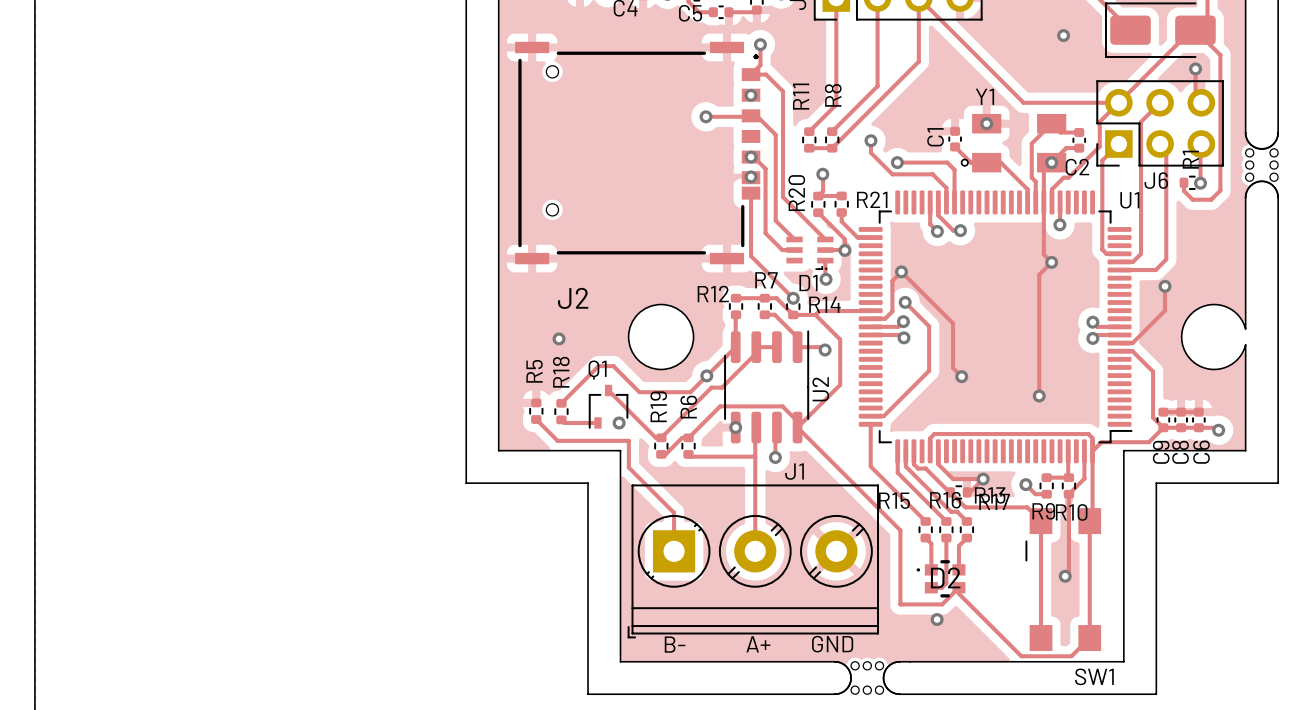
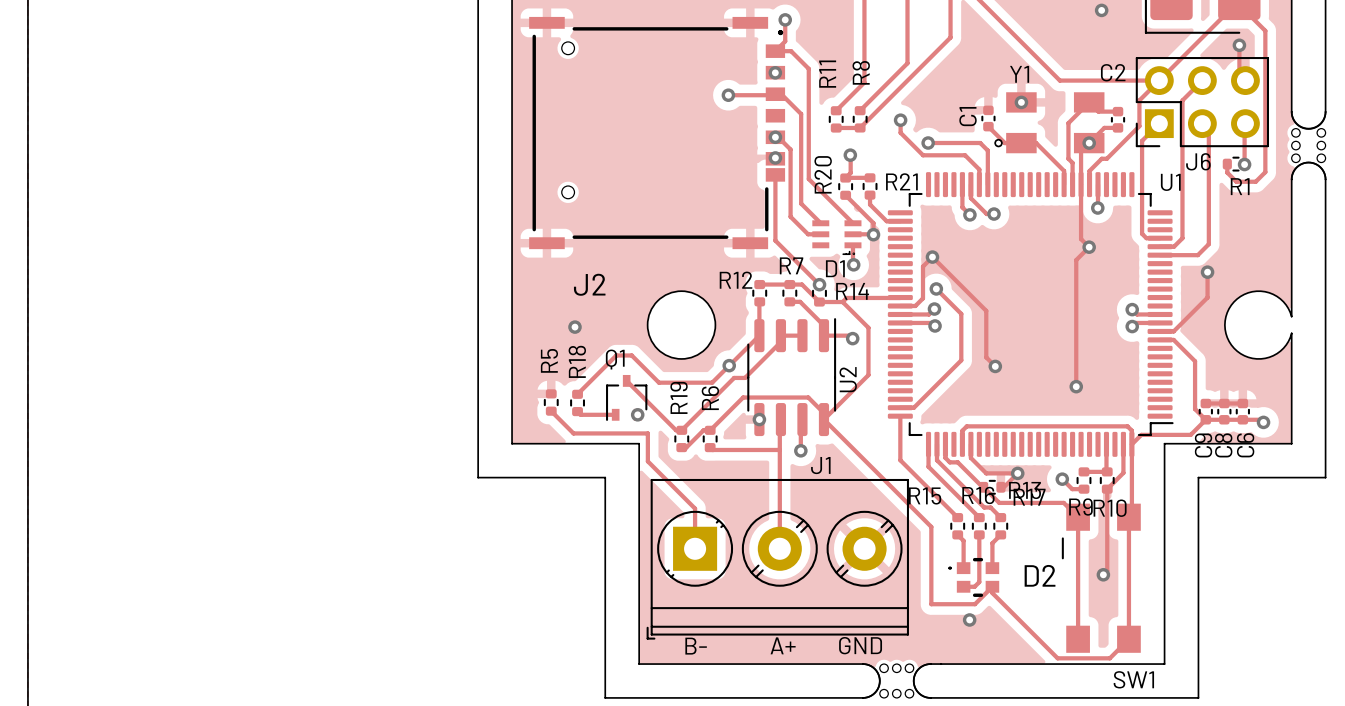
R1 name rotation: 0° (1190, 159) -> 90° clockwise (1240, 186)
R1 name position: R1 (1190, 159) -> R1 (1240, 186)
C2 name position: C2 (1077, 167) -> C2 (1113, 72)
D2 name position: D2 (945, 577) -> D2 (1040, 575)

